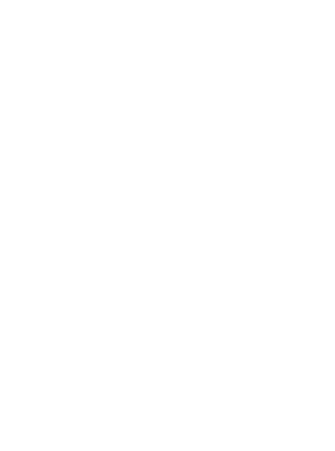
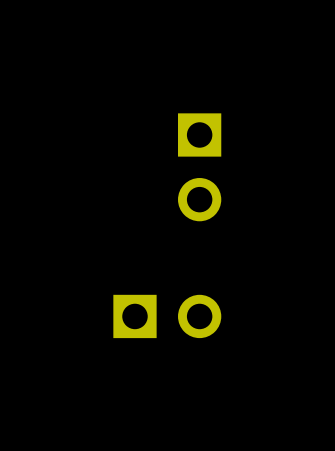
part: none -> (199, 167)
part: none -> (167, 316)

